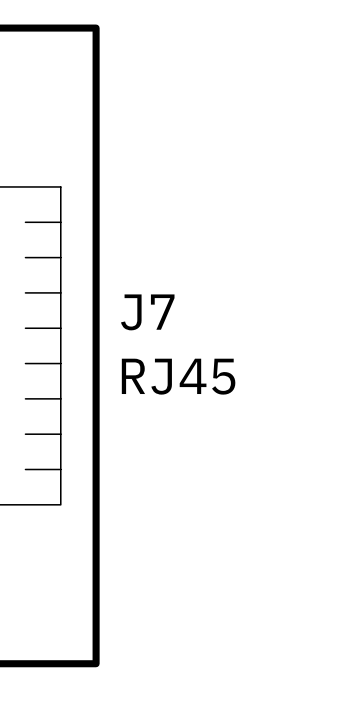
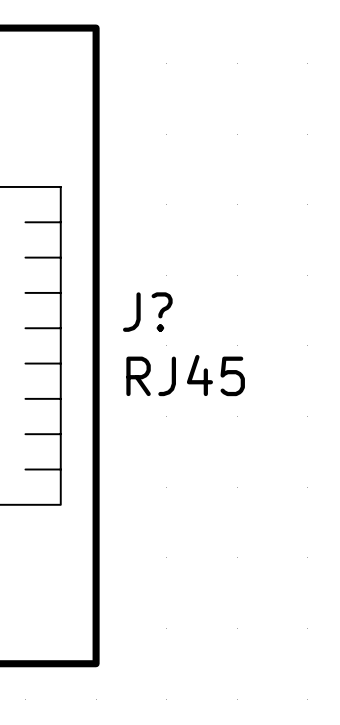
J7 name: J7 (147, 312) -> J? (147, 312)

